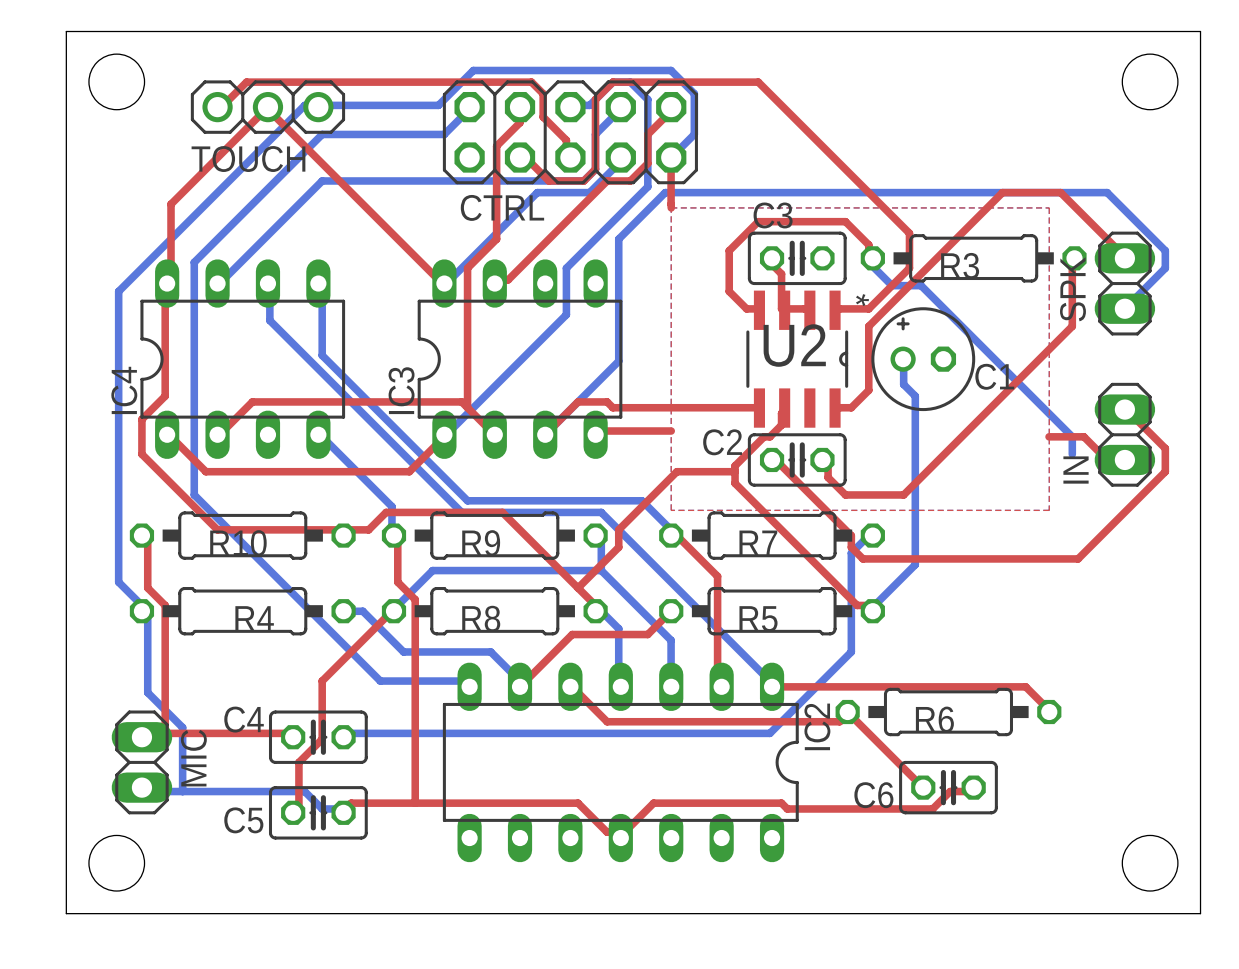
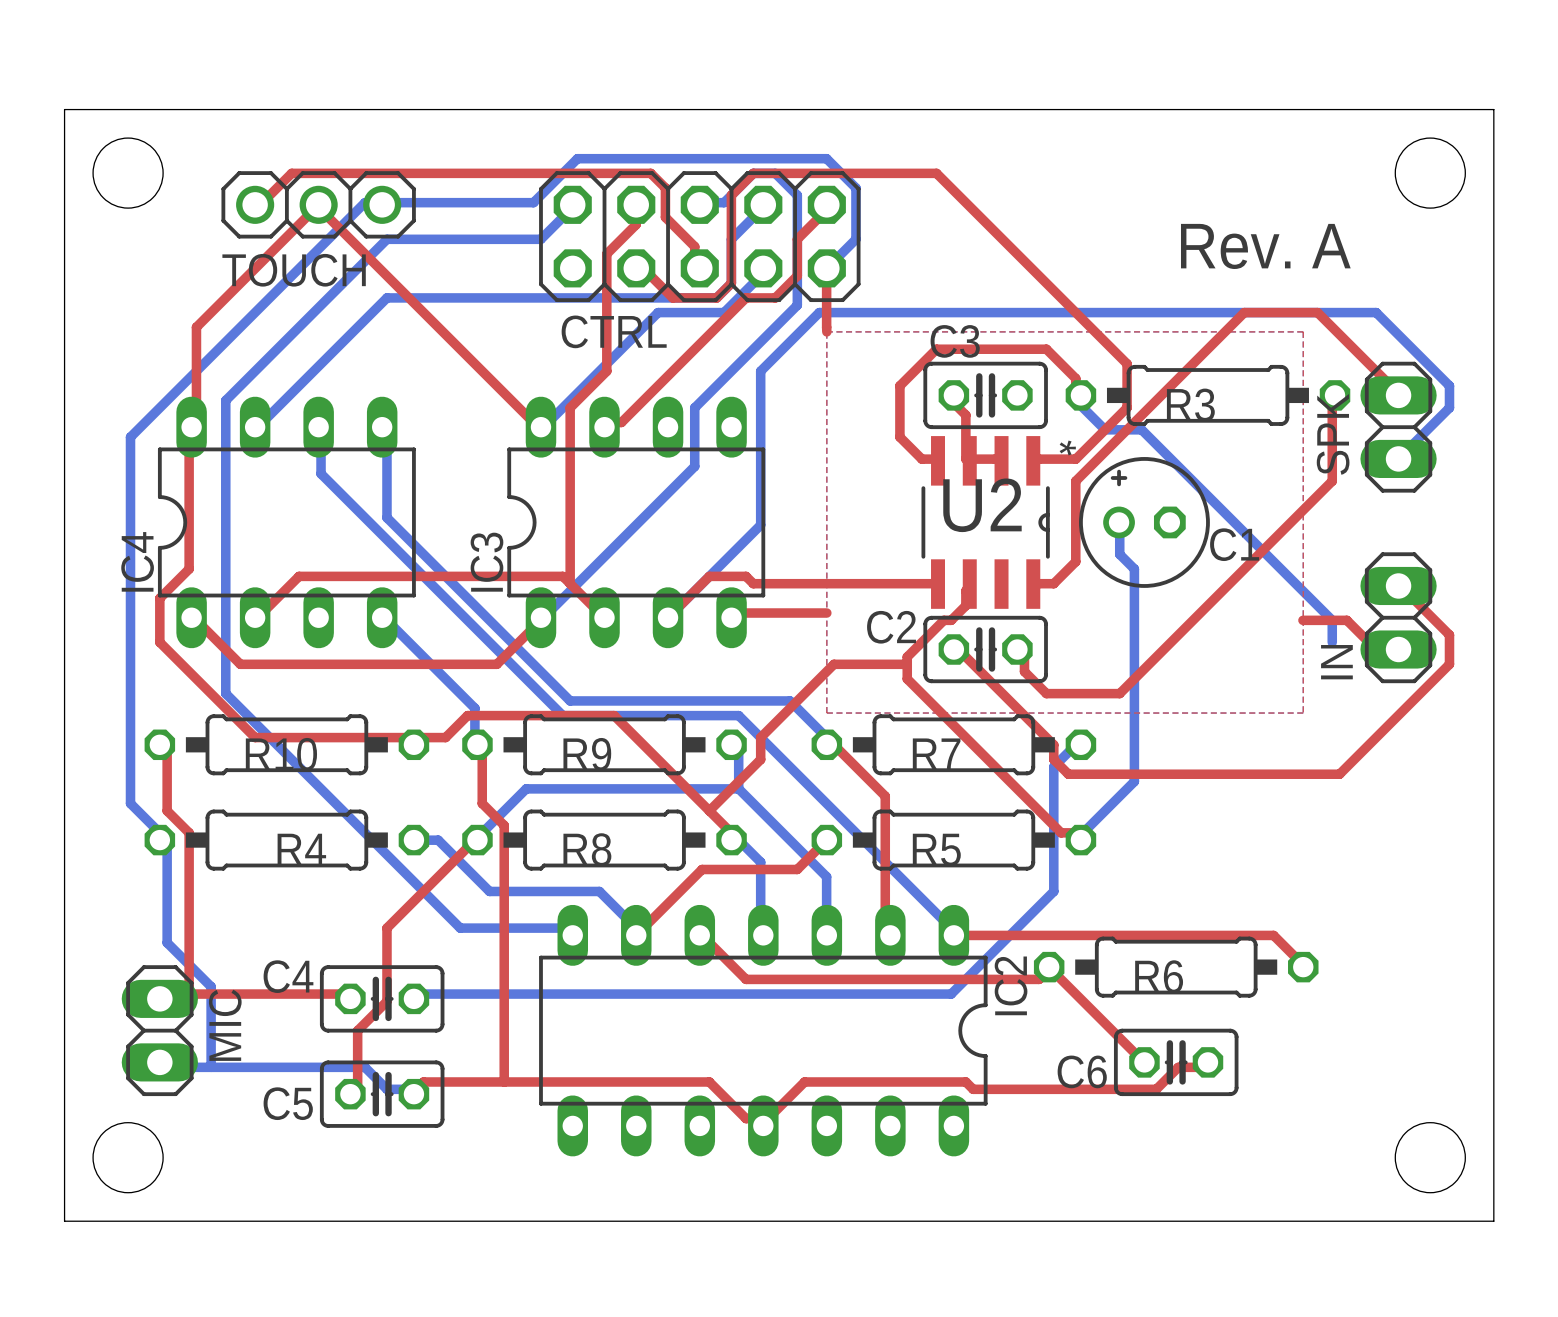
text: none -> Rev. A (1265, 246)

